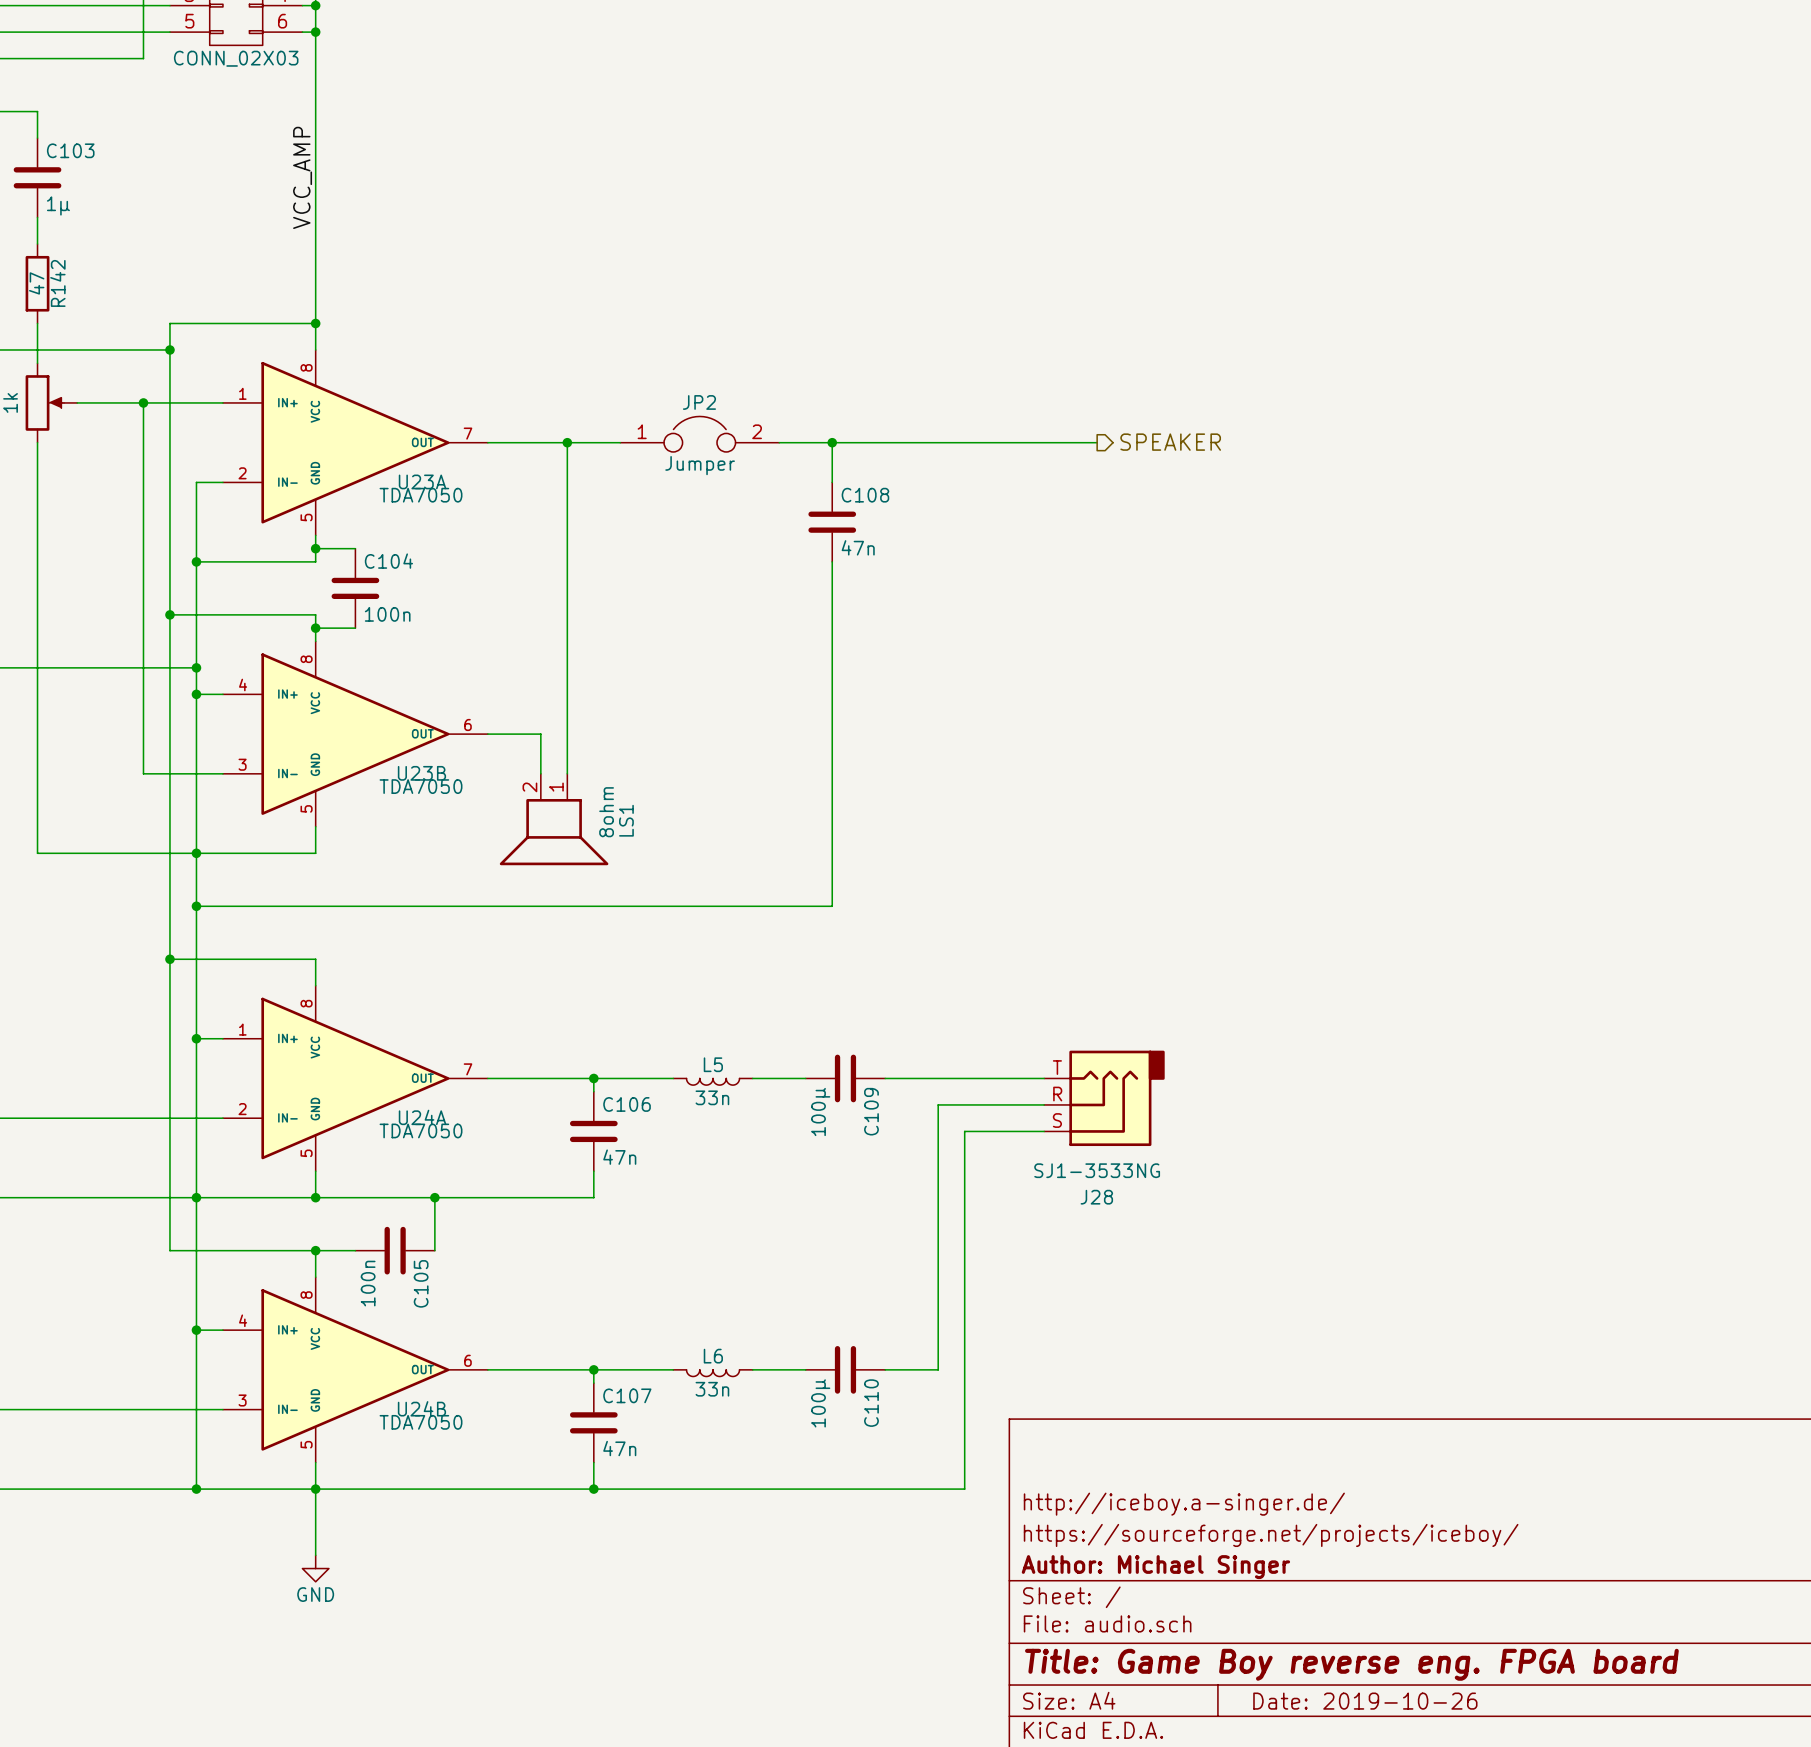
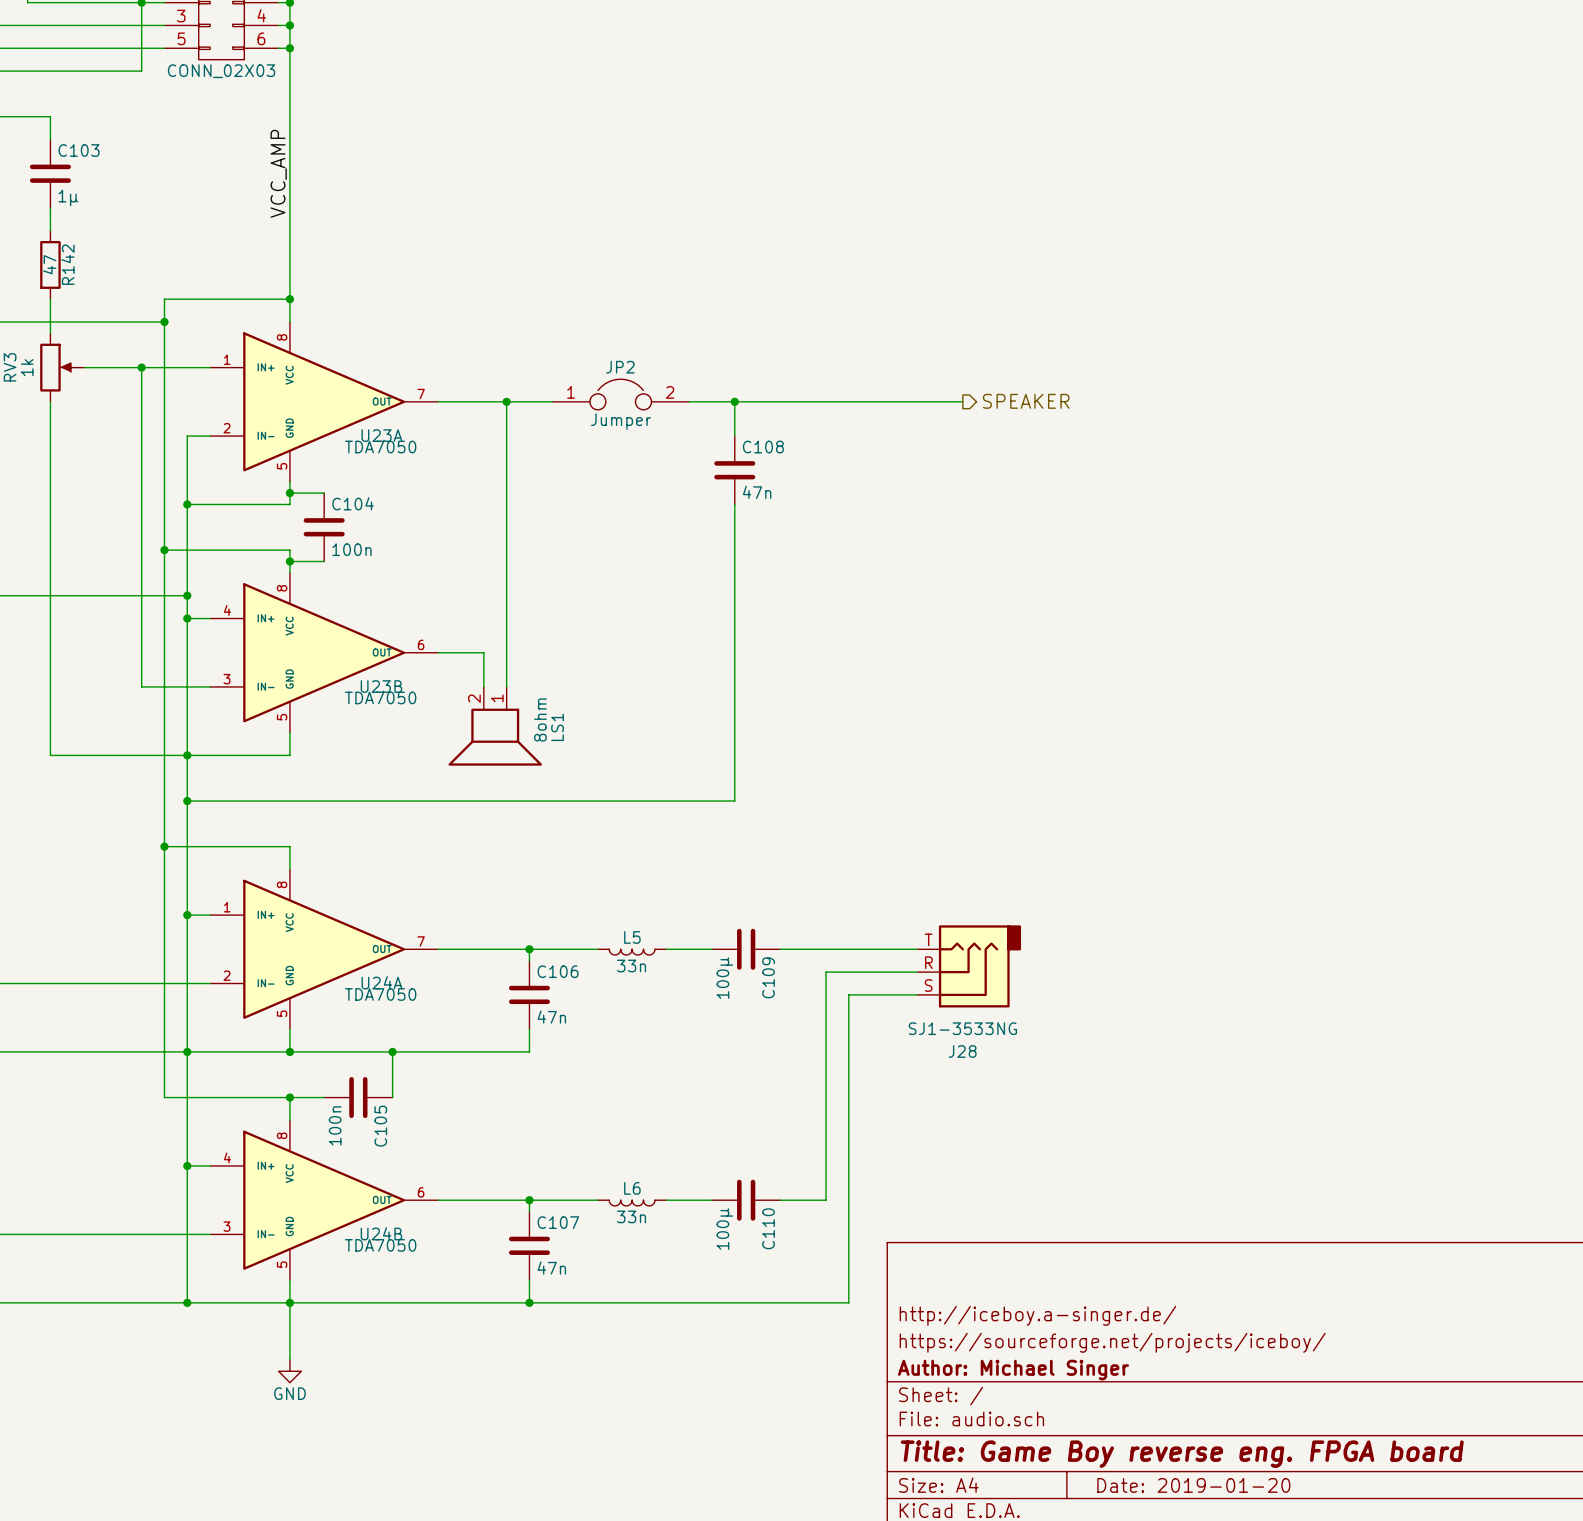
title block: Date: 2019-10-26 (1365, 1701) -> Date: 2019-01-20 (1193, 1485)

